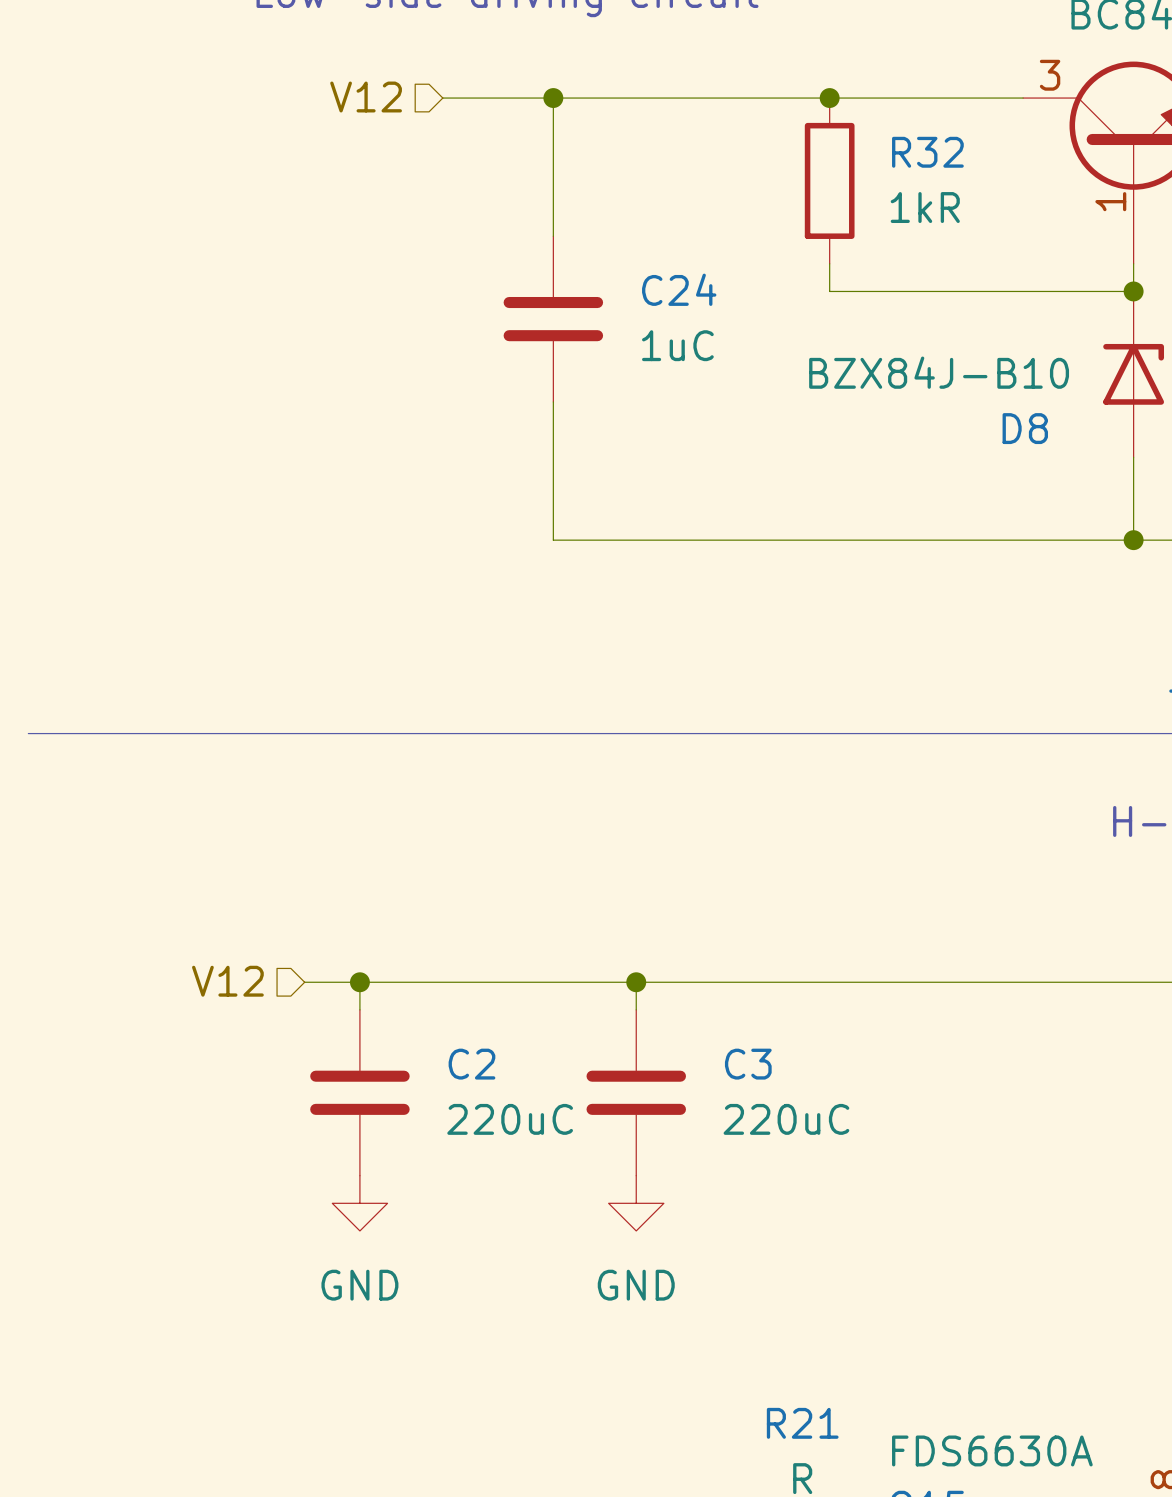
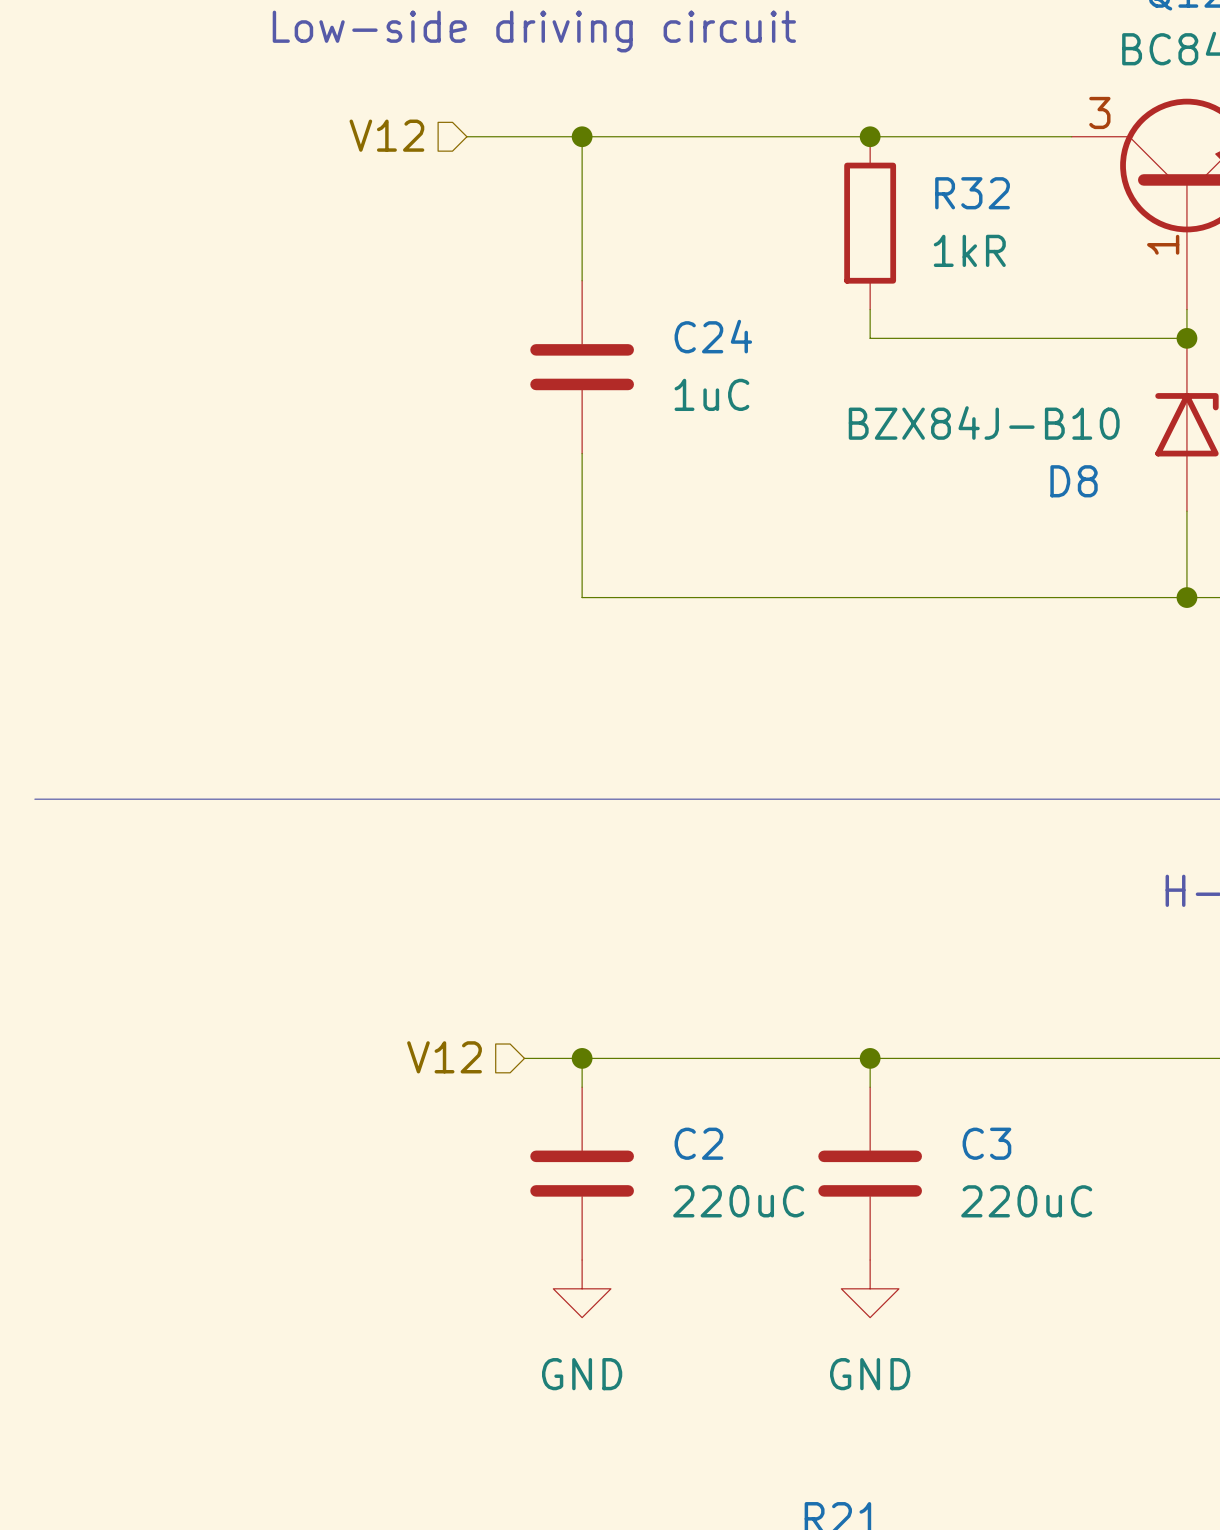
hierarchical label position: V12 (227, 981) -> V12 (444, 1057)
wire: (304, 982) (498, 982) -> none
wire: (359, 982) (359, 1009) -> (870, 1058) (870, 1087)
junction: (359, 982) -> none
wire: (636, 982) (636, 1009) -> (582, 1058) (582, 1087)
junction position: (636, 982) -> (582, 1058)
junction: none -> (870, 1058)
C2 position: (359, 1092) -> (582, 1173)
C3 position: (636, 1092) -> (870, 1173)
power symbol: GND (359, 1203) -> none
power symbol position: GND (636, 1203) -> GND (582, 1288)
power symbol: none -> GND (870, 1288)

